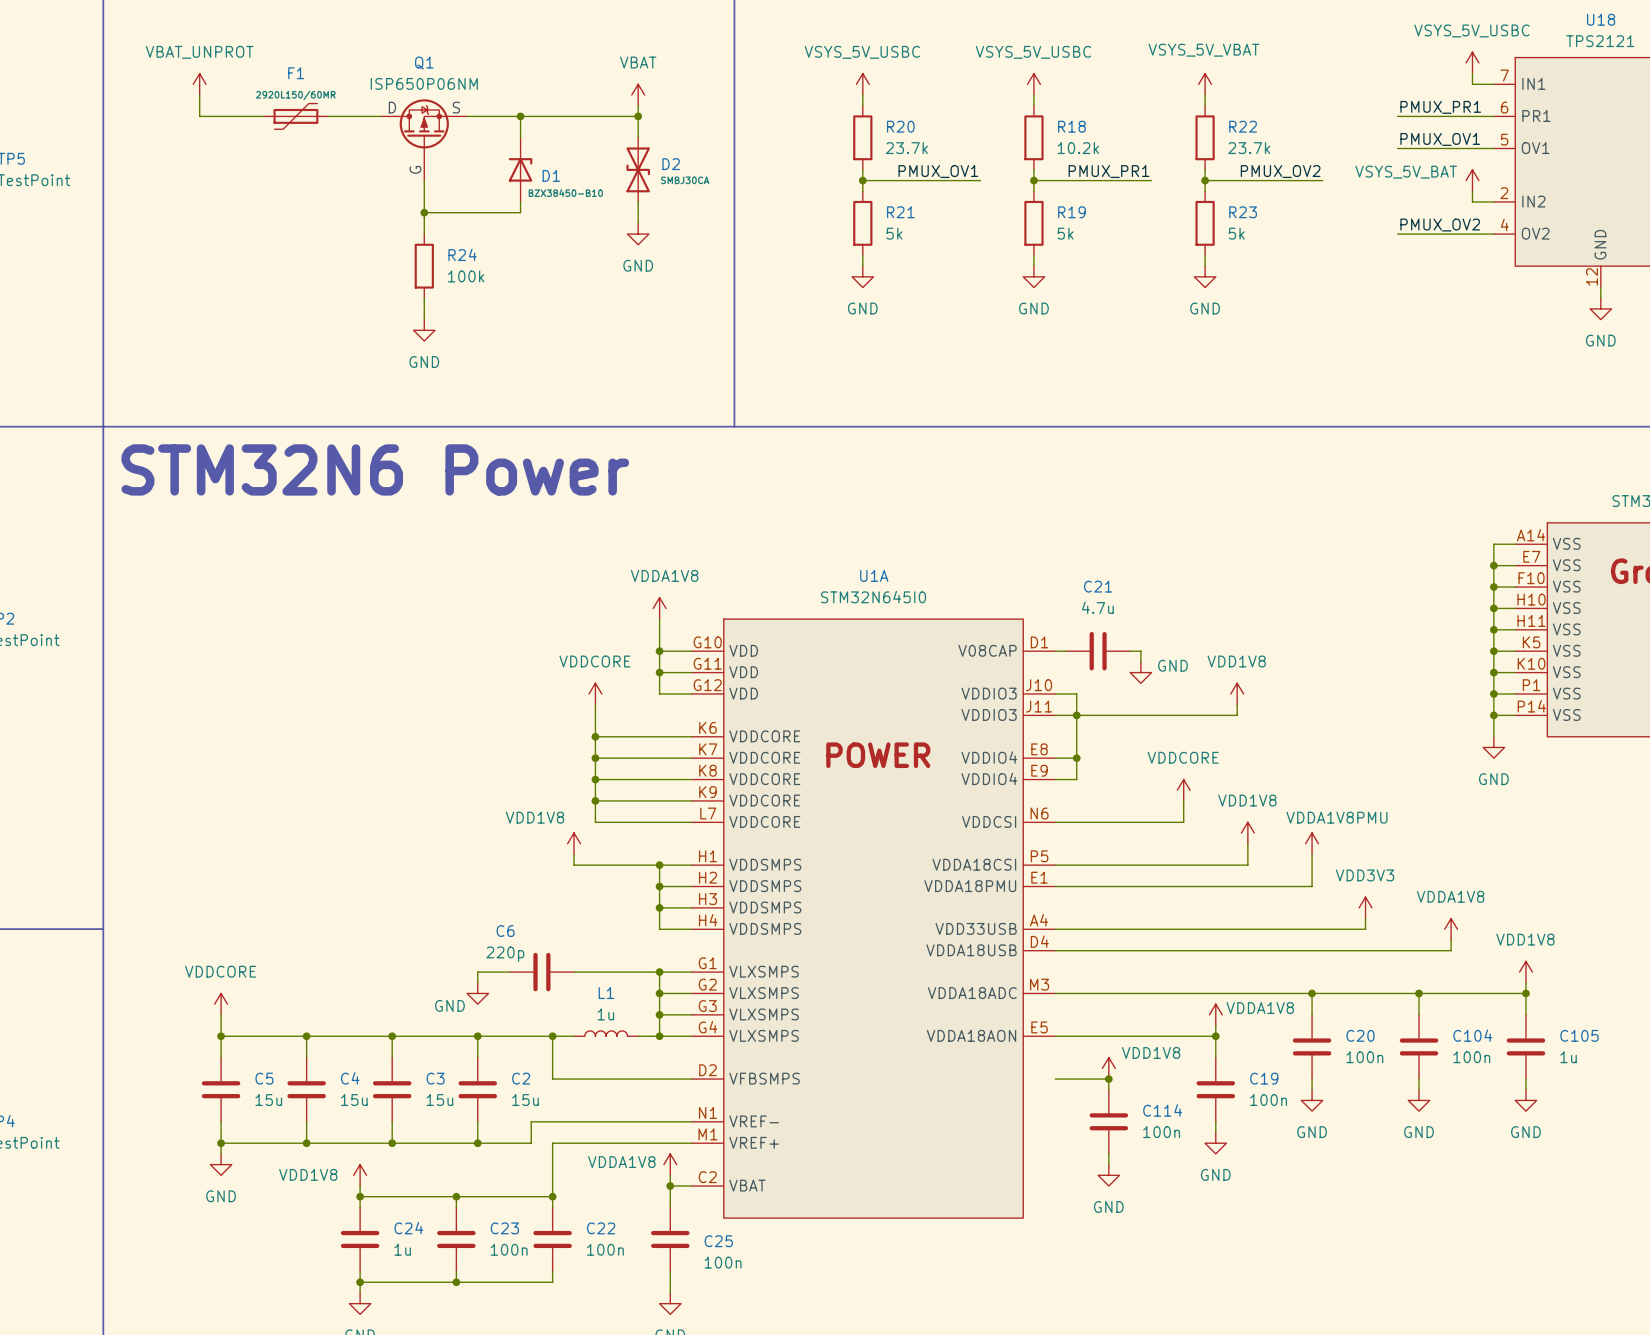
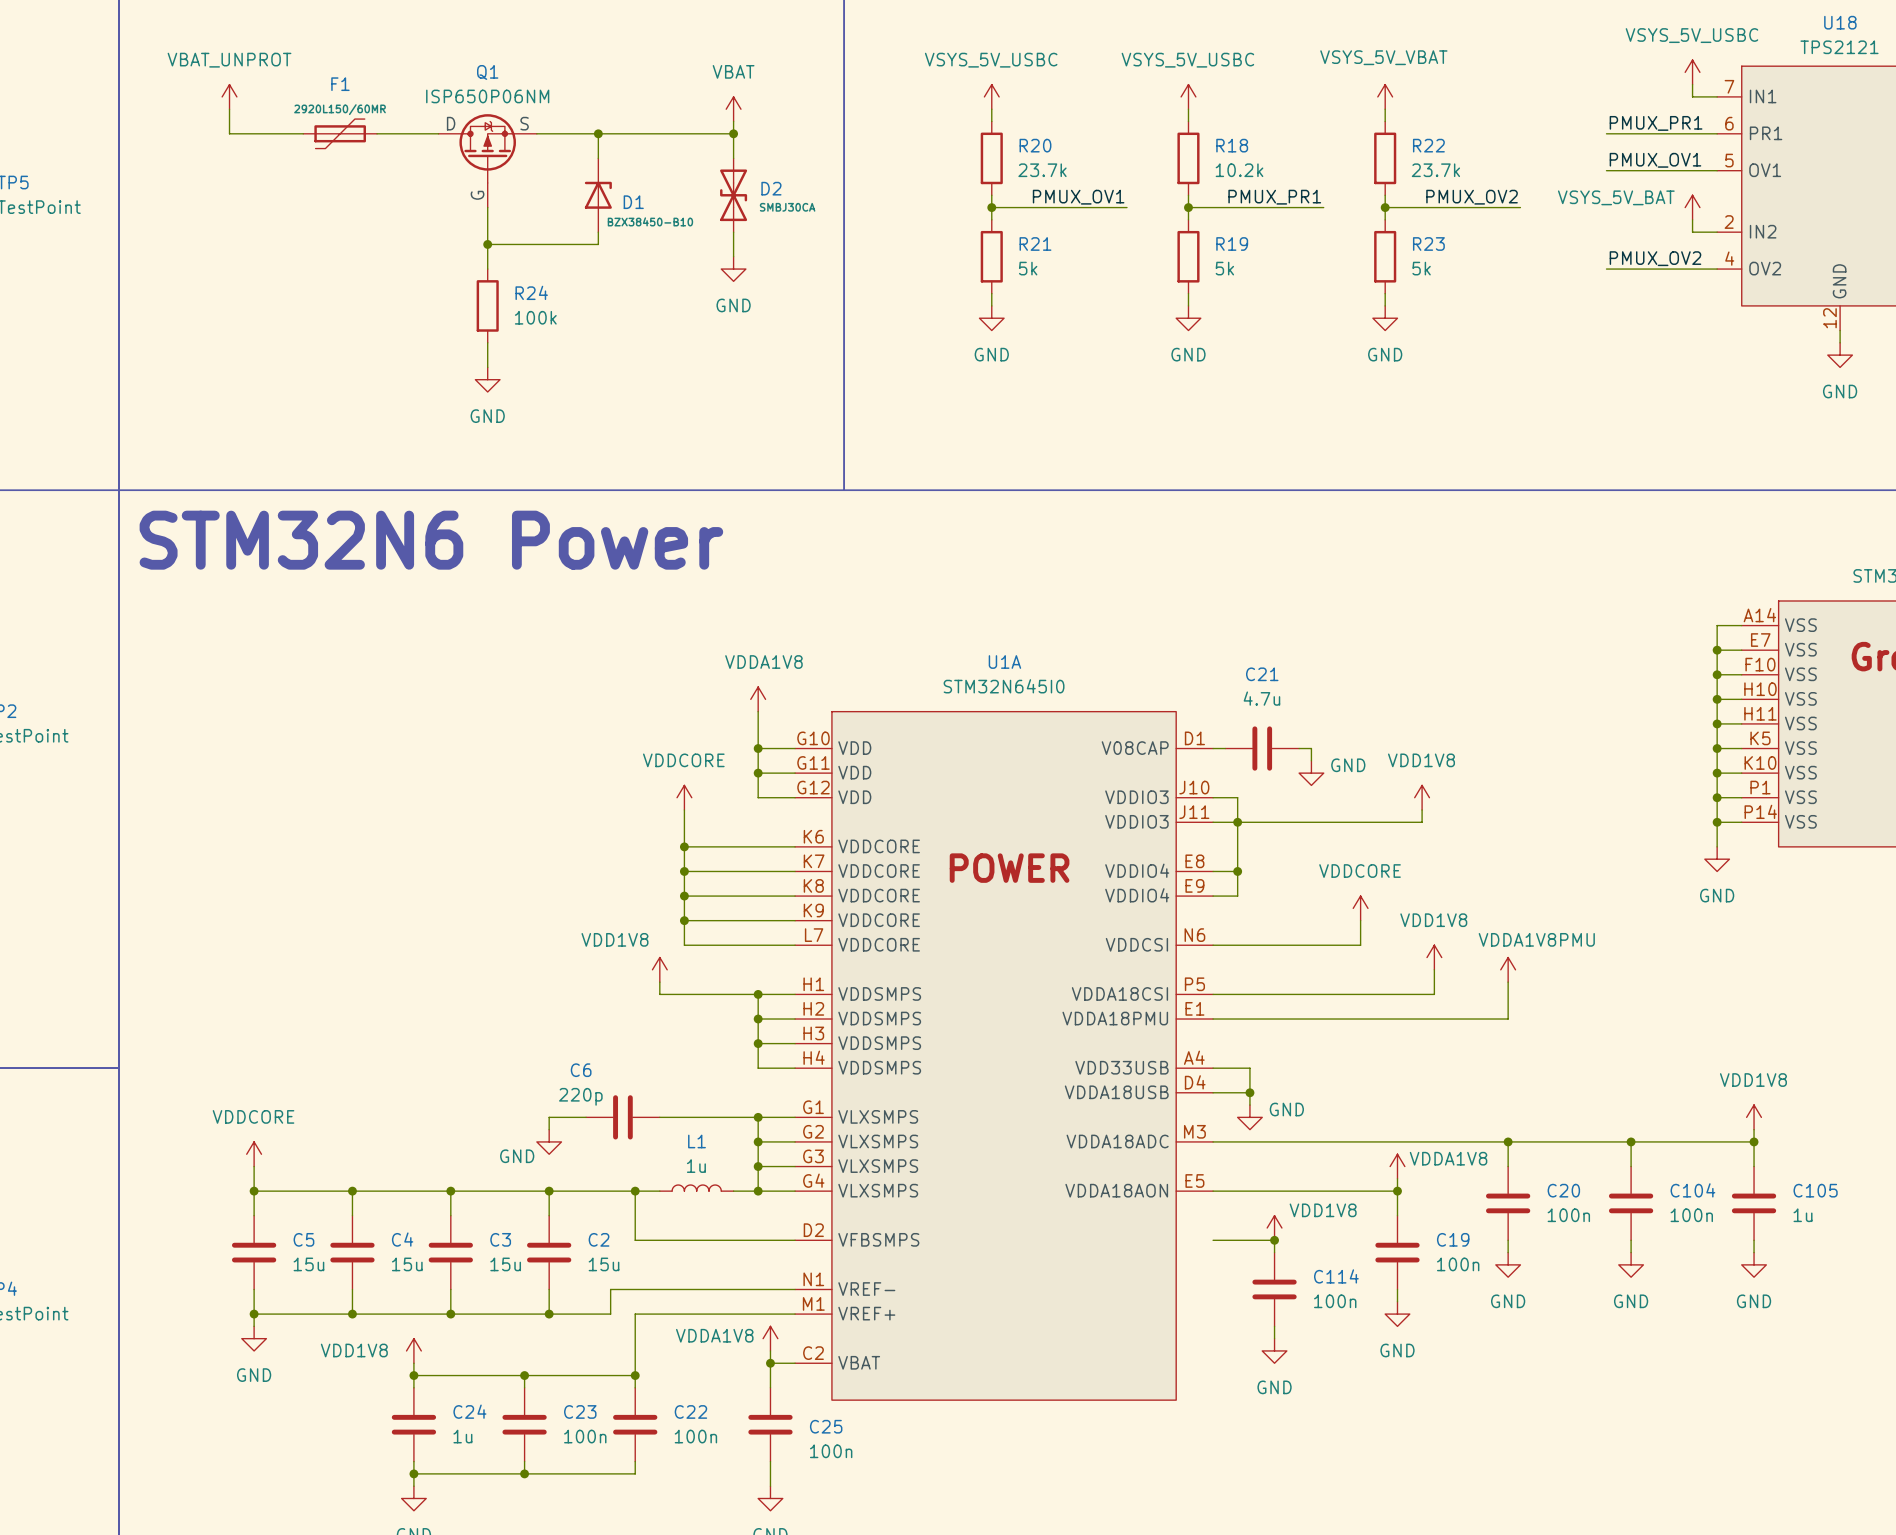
power symbol: VDD3V3 (1365, 907) -> none
wire: (1365, 918) (1365, 929) (1087, 929) -> (1249, 1105) (1249, 1068)
power symbol: VDDA1V8 (1451, 929) -> none
wire: (1451, 939) (1451, 950) (1087, 950) -> none
junction: none -> (1249, 1092)
power symbol: none -> GND (1249, 1117)

